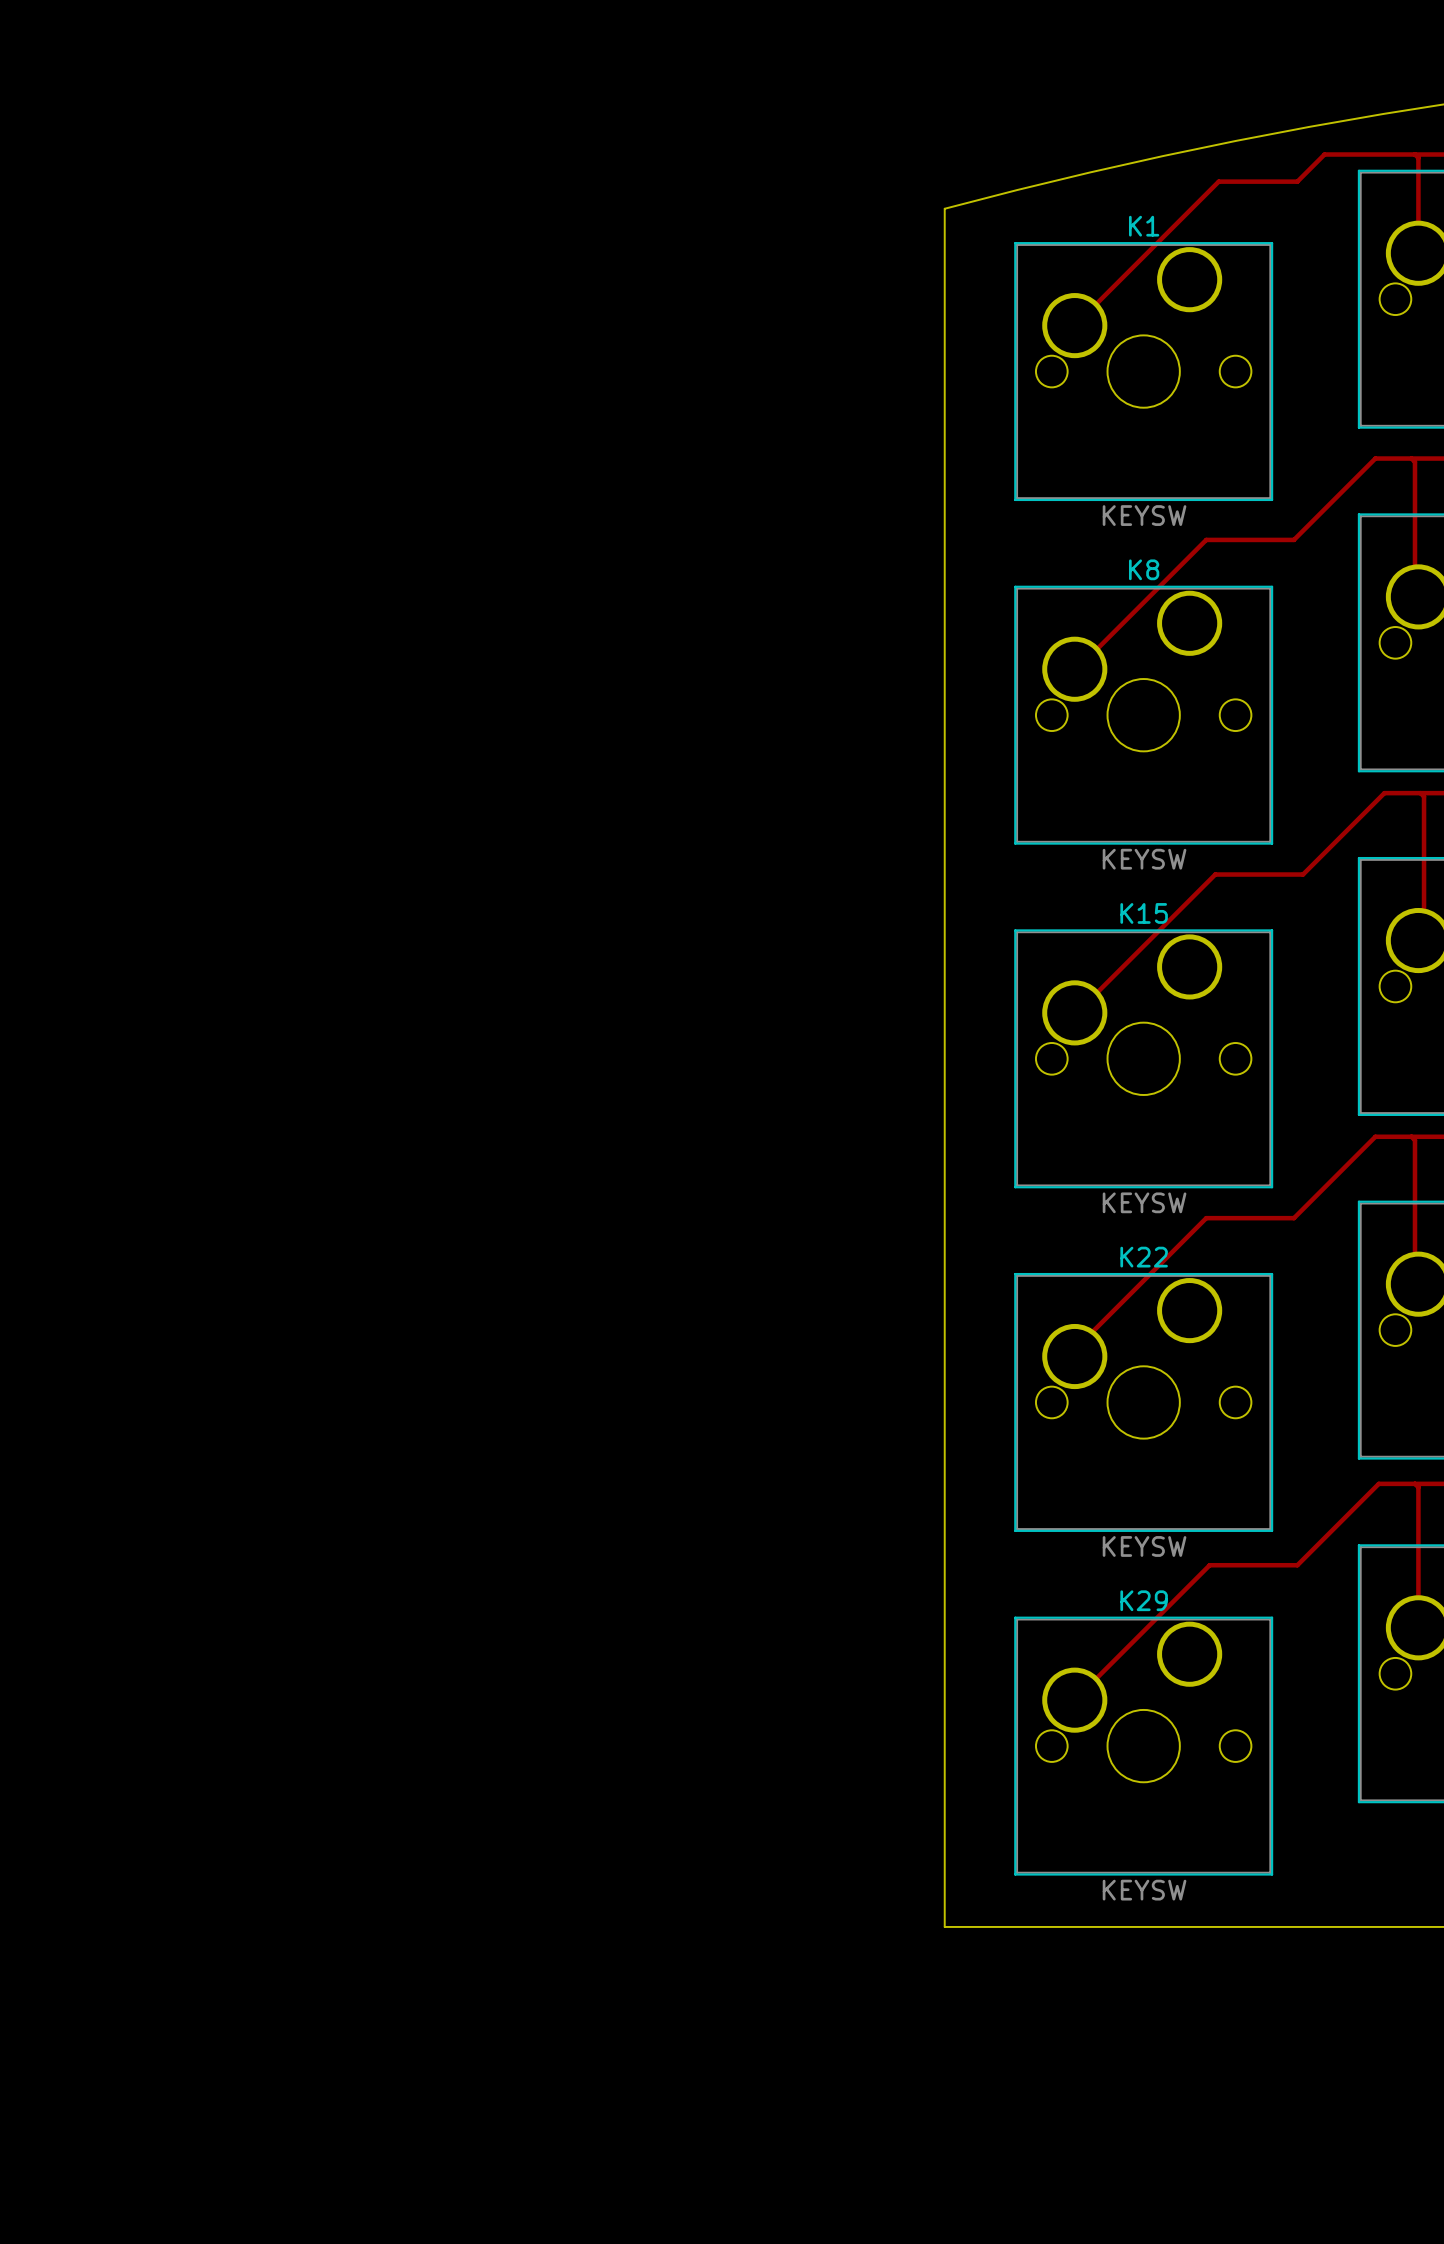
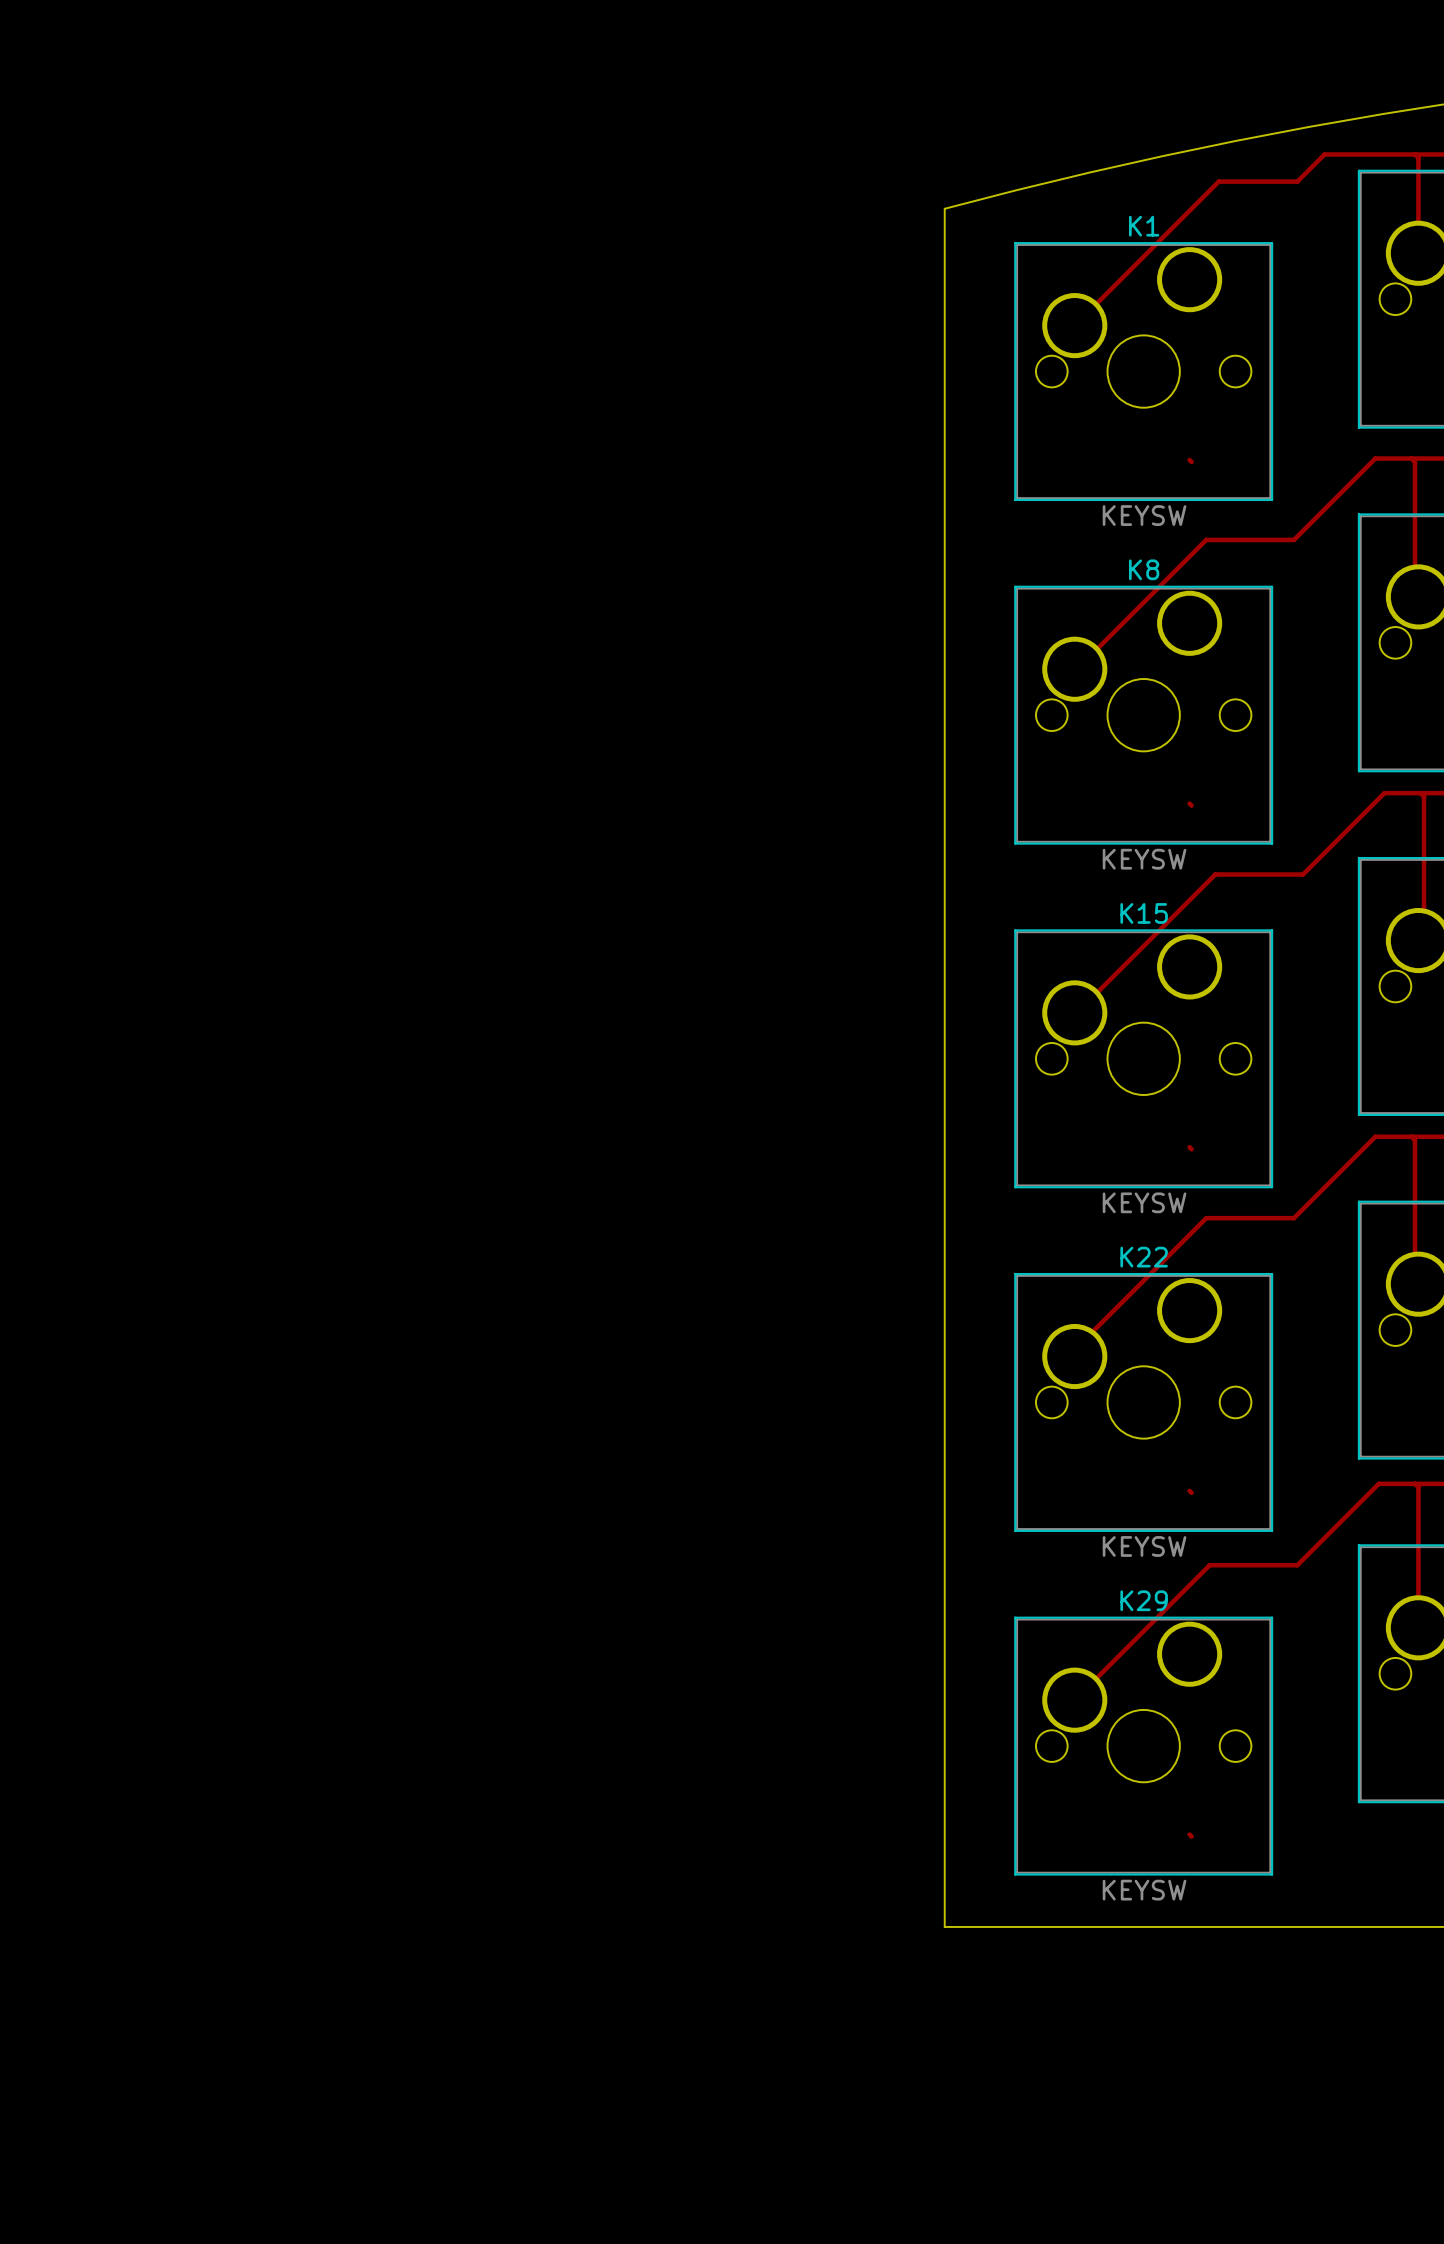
track: none -> (1189, 459) (1191, 461)
track: none -> (1189, 803) (1191, 805)
track: none -> (1189, 1147) (1191, 1149)
track: none -> (1189, 1490) (1191, 1492)
track: none -> (1189, 1834) (1191, 1836)

